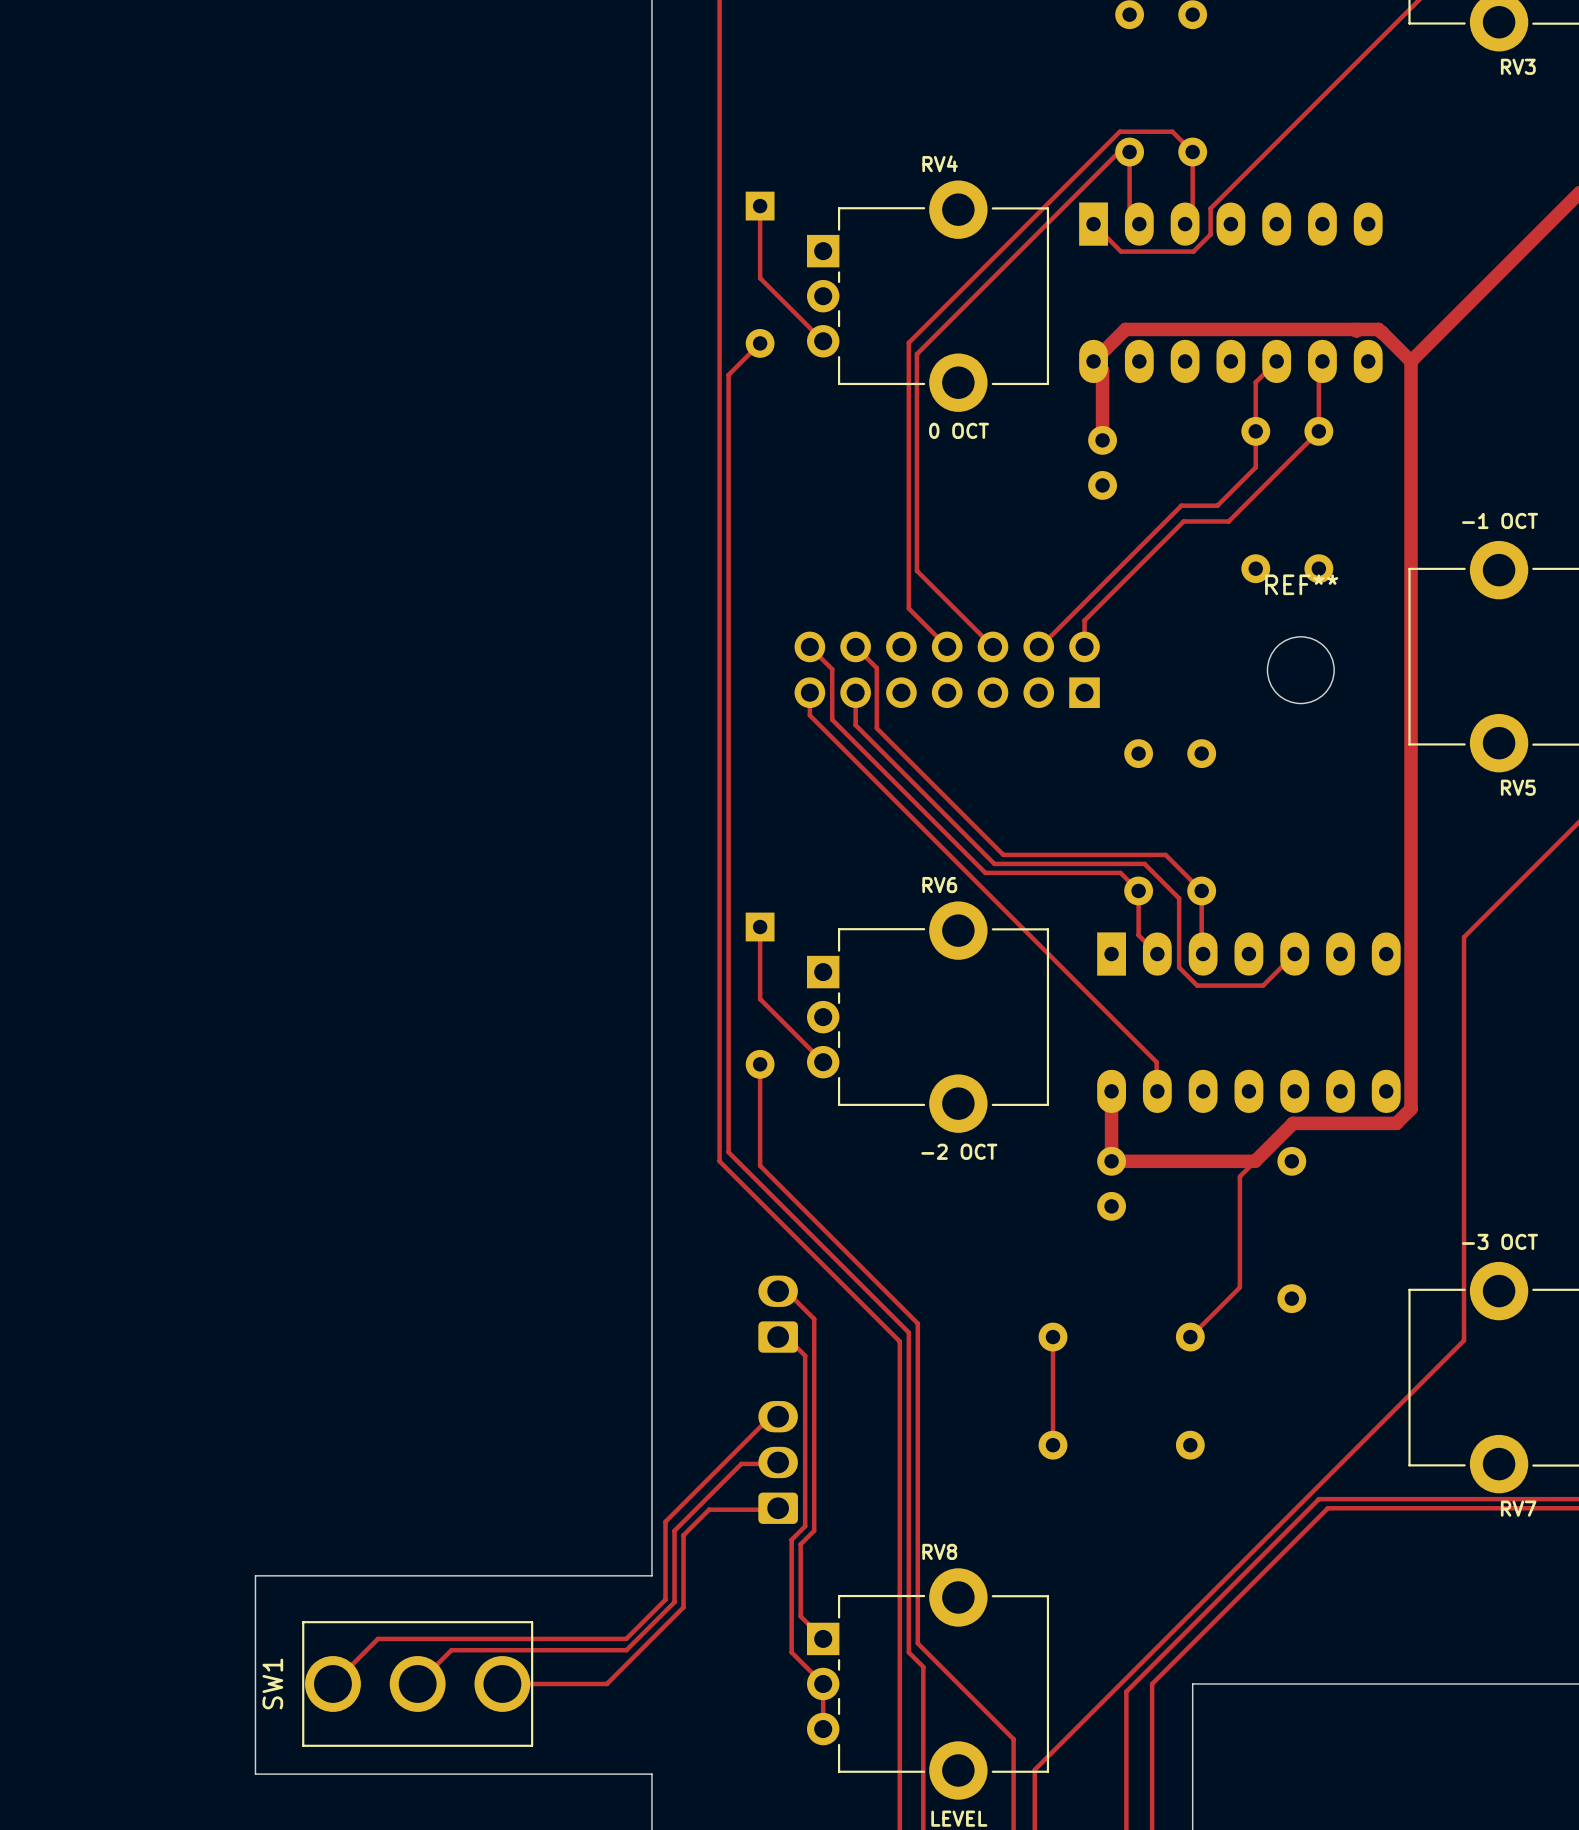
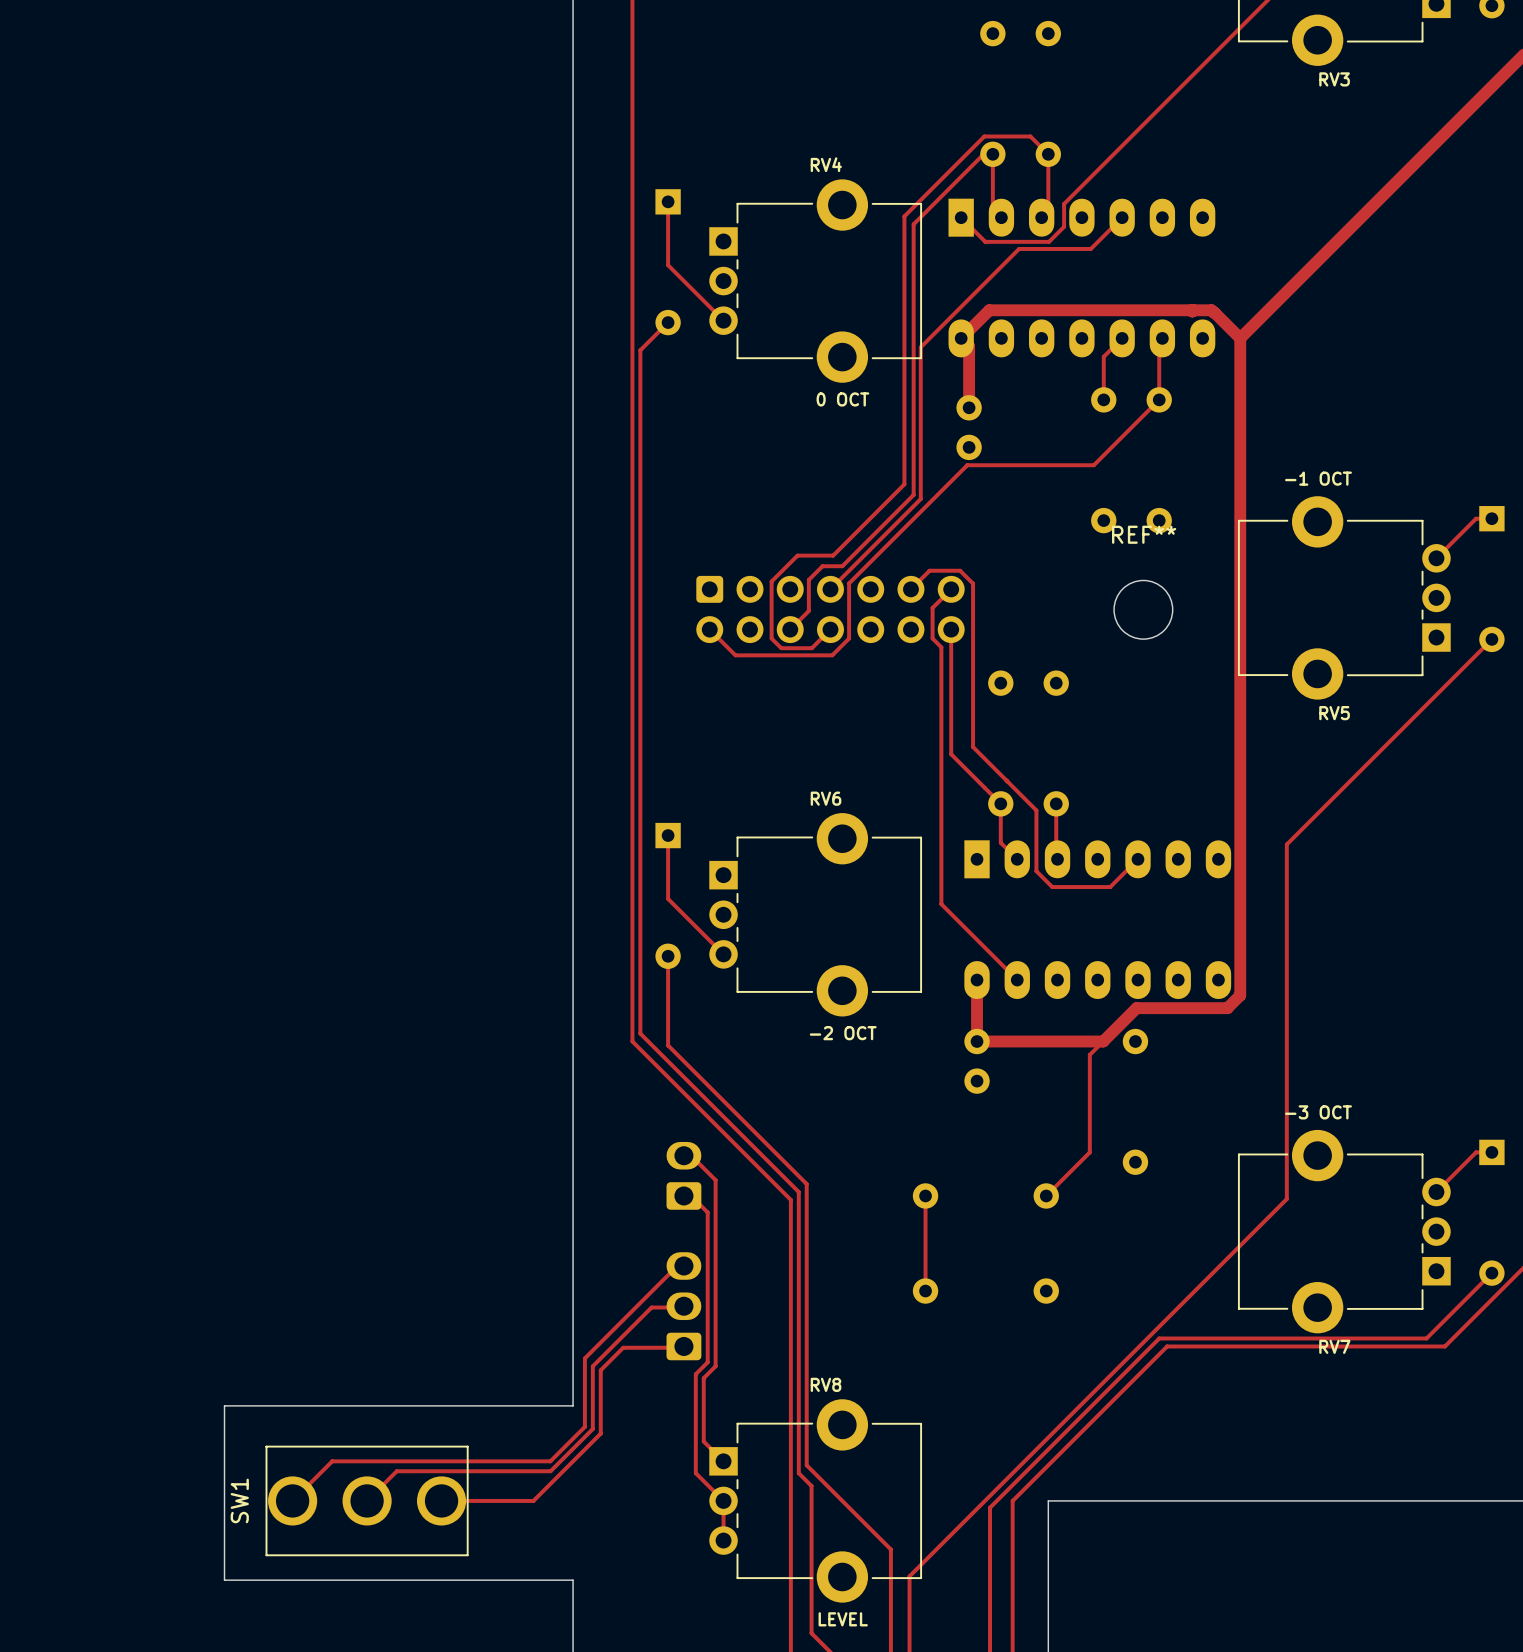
track: (1028, 222) (908, 342) (908, 608) (947, 646) -> (904, 216) (904, 484) (833, 555) (797, 555) (771, 581) (771, 638) (781, 648) (811, 648) (830, 629)
track: none -> (1122, 217) (1090, 248) (1019, 248) (920, 347) (920, 499) (830, 589)
track: (1039, 231) (916, 354) (916, 570) (992, 646) -> (913, 224) (913, 494) (842, 566) (822, 566) (808, 579) (808, 610) (790, 629)
track: (1255, 431) (1255, 467) (1217, 505) -> (1093, 465) (1070, 465)
track: (1181, 505) (1038, 646) -> (1038, 465) (967, 465) (849, 583) (849, 638) (832, 655) (735, 655) (709, 629)
track: (1244, 505) (1228, 521) (1183, 521) (1084, 620) (1084, 646) -> none
part footprint: [794, 631, 1100, 709] -> [696, 575, 965, 644]
track: (809, 646) (832, 669) (832, 719) (985, 872) (1120, 872) -> (951, 629) (951, 754) (984, 788)
track: (855, 646) (876, 668) (876, 728) (1003, 854) (1165, 854) (1201, 890) -> none
track: (809, 692) (809, 715) (1156, 1062) (1156, 1090) -> (951, 589) (932, 607) (932, 638) (941, 647) (941, 904) (1016, 979)
track: (855, 692) (855, 725) (994, 863) (1144, 863) -> (910, 589) (929, 570) (960, 570) (973, 583) (973, 747) (1006, 780)

